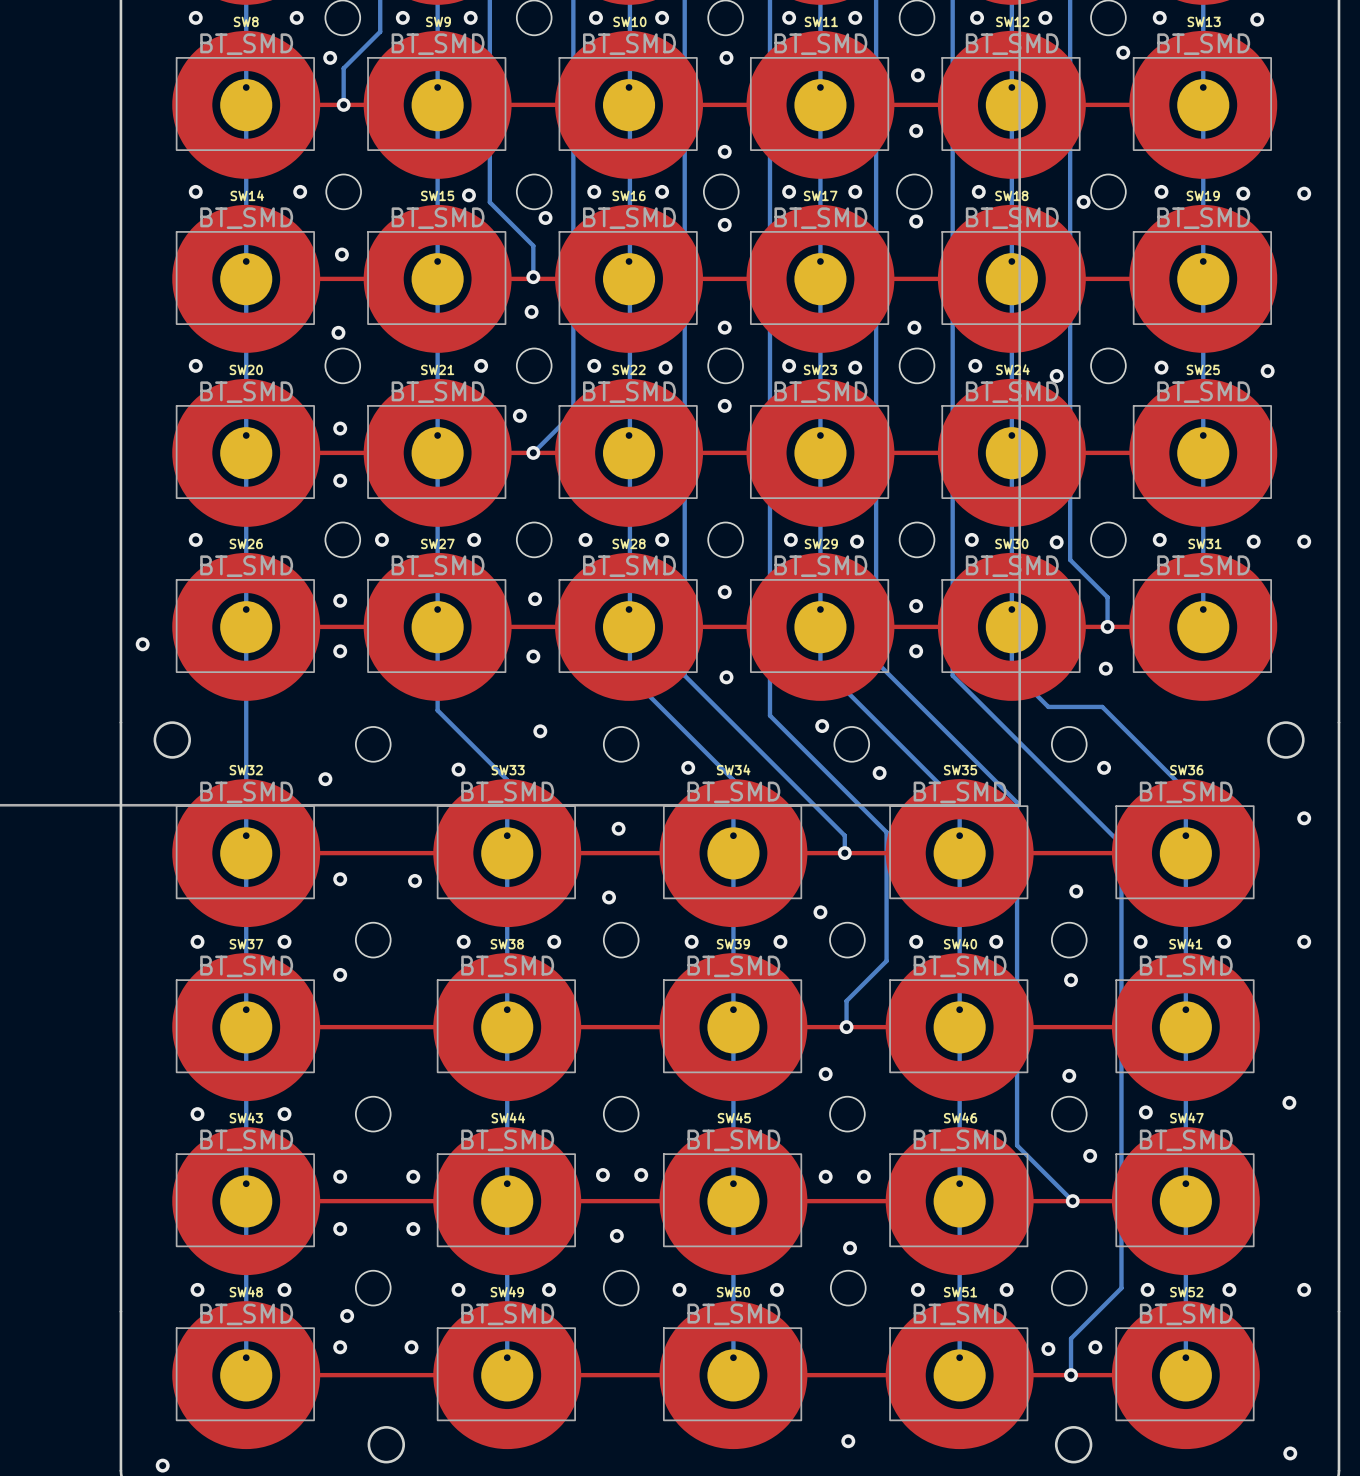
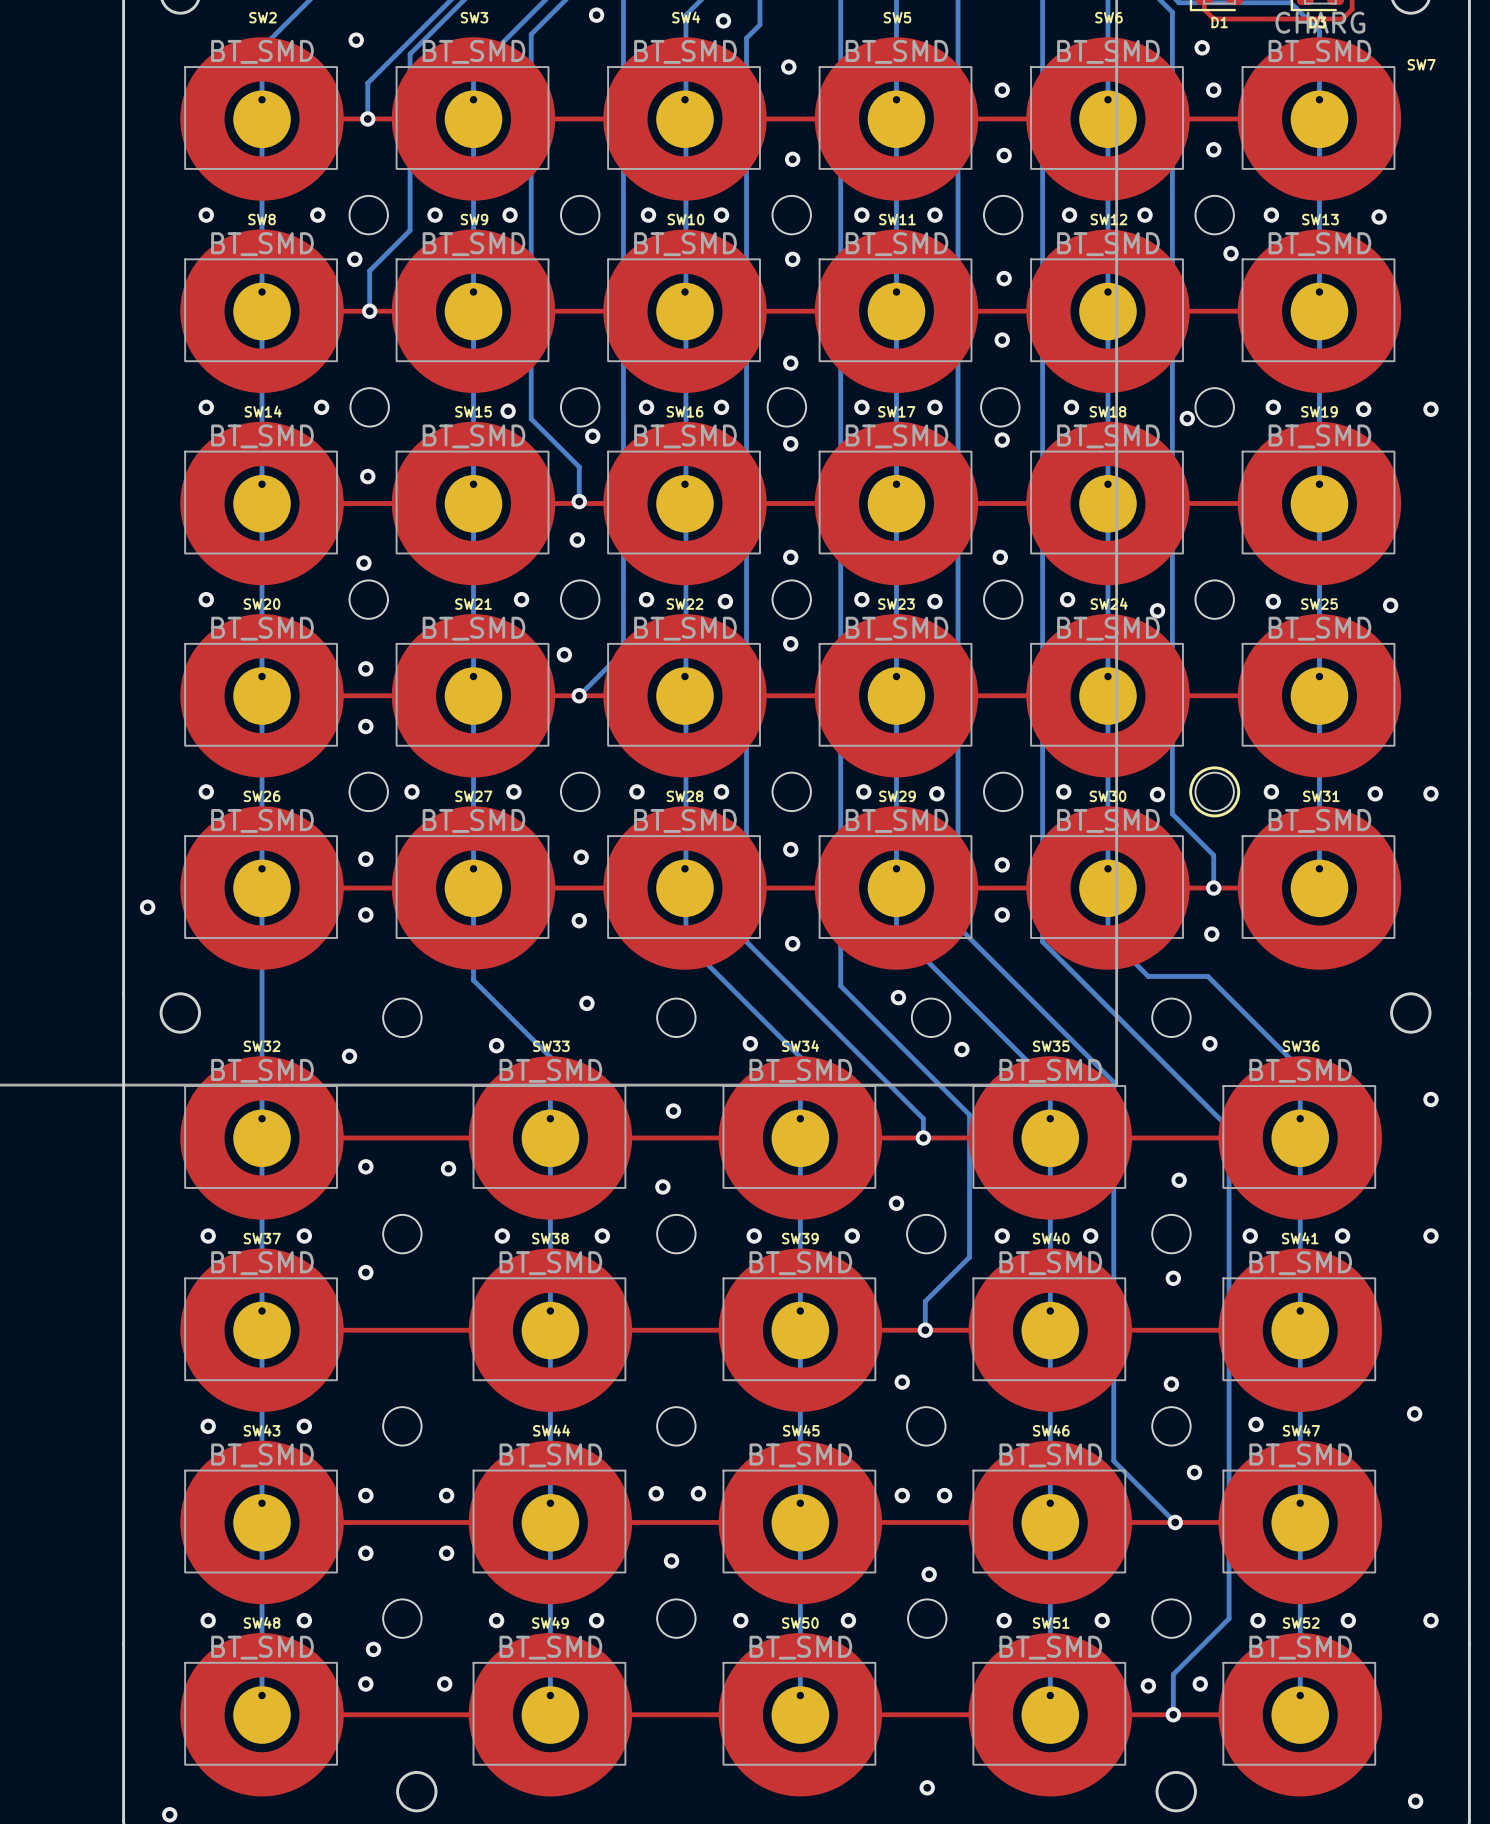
drawing: none -> [1189, 766, 1241, 818]

